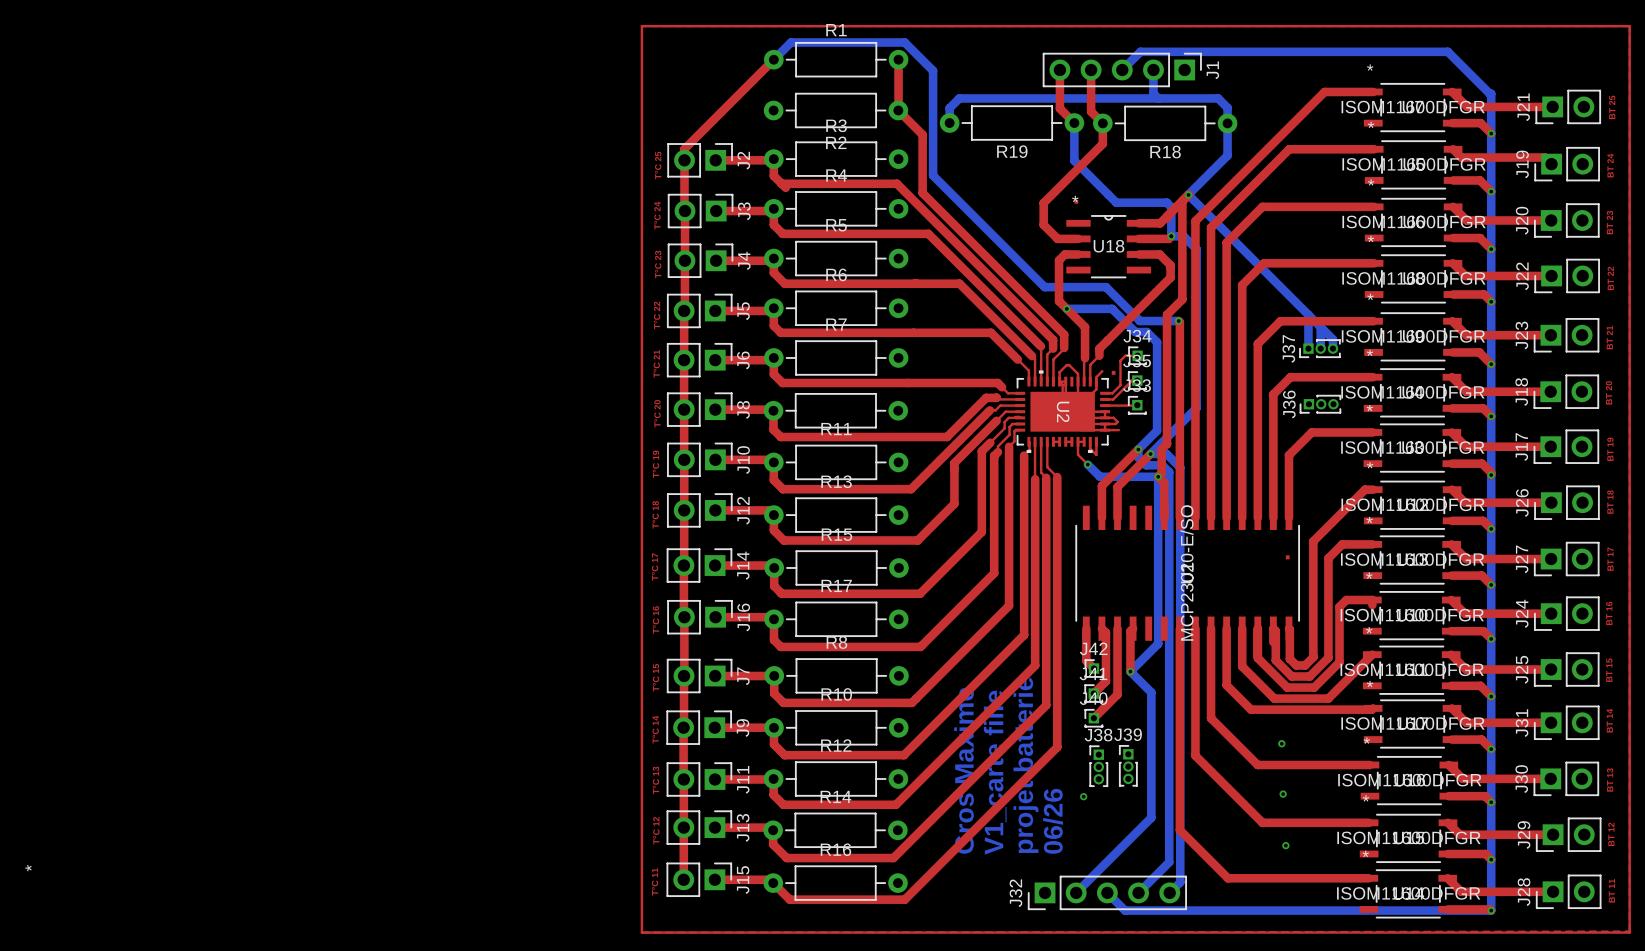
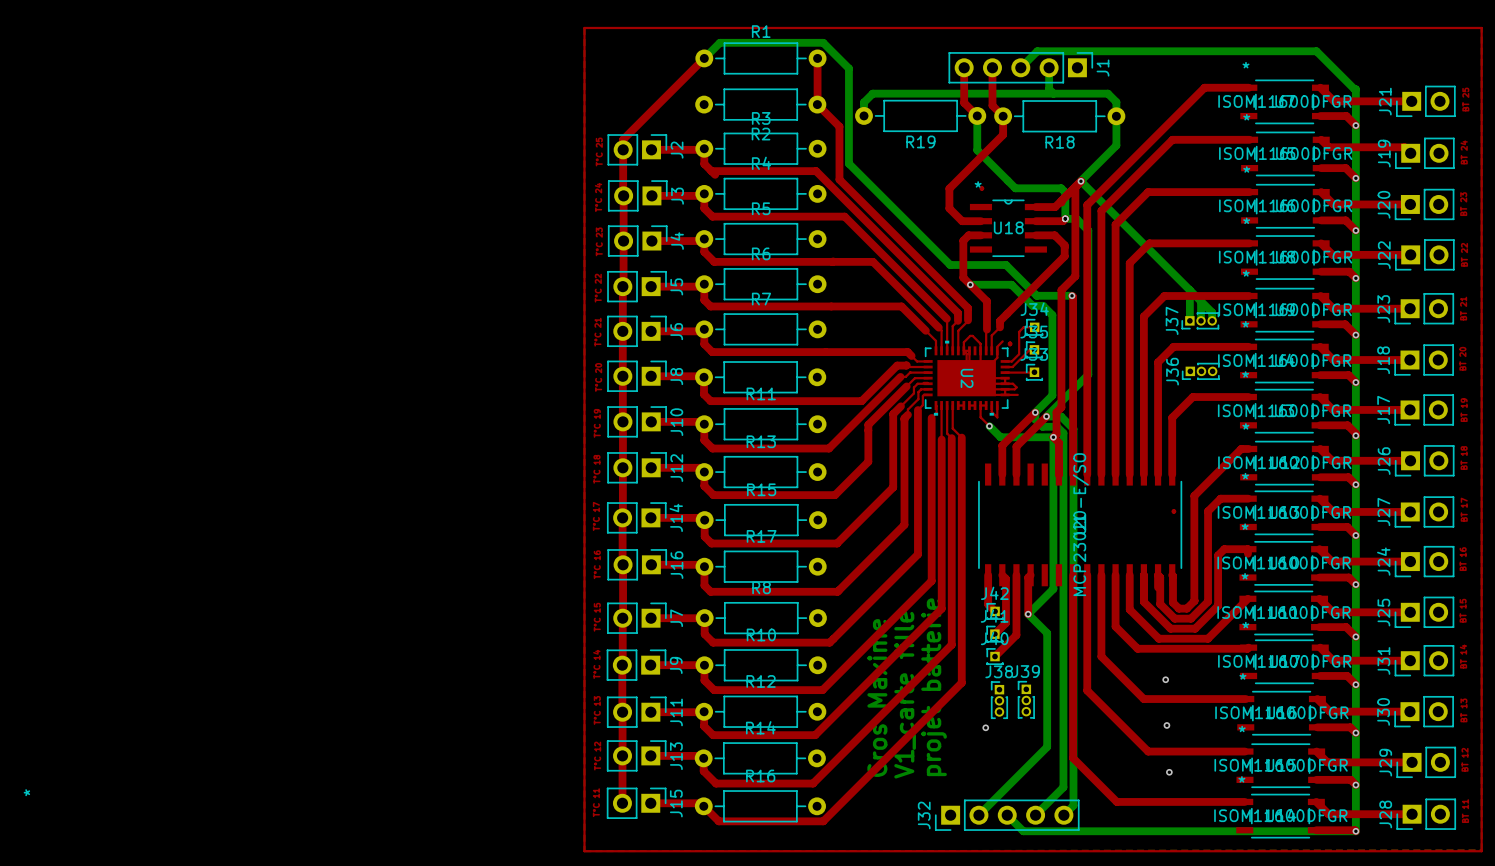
text: 06/26 (1053, 821) -> none

